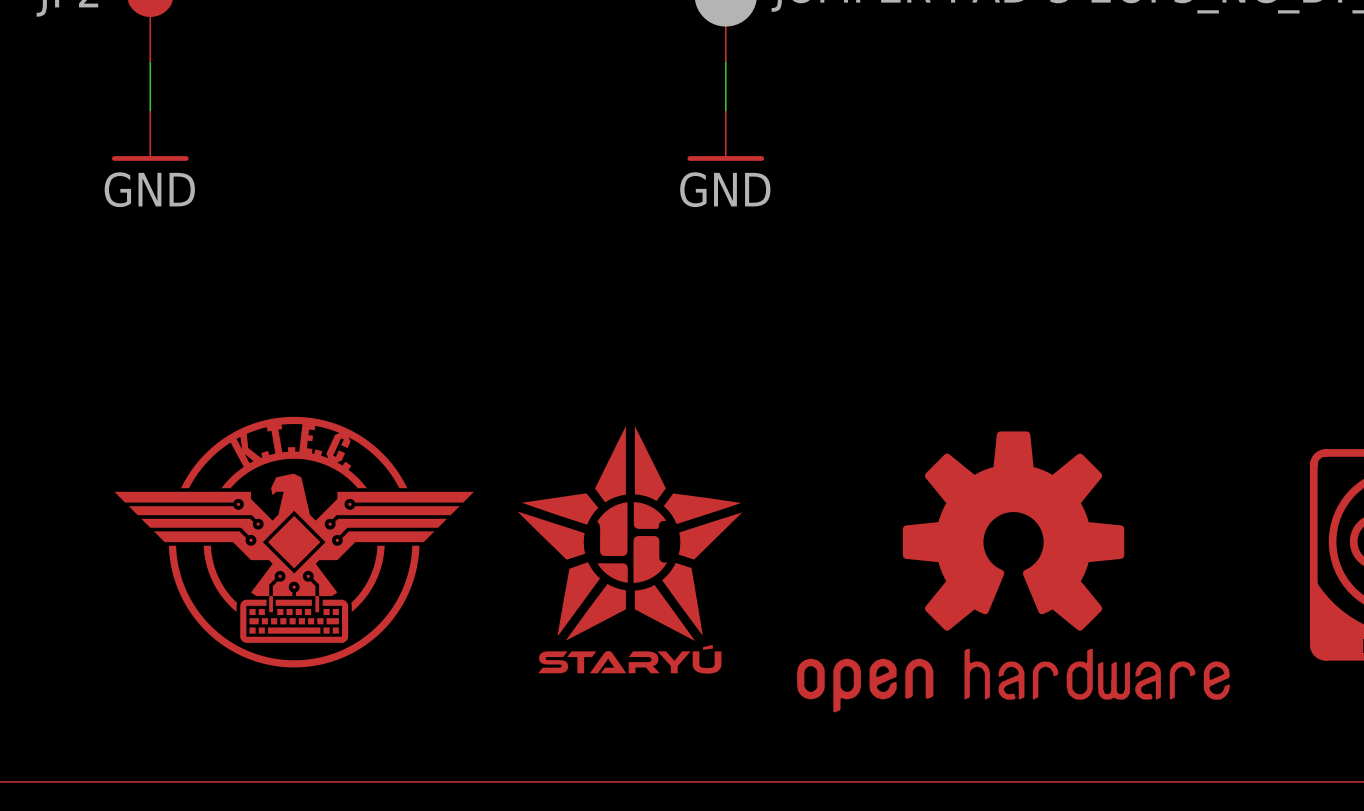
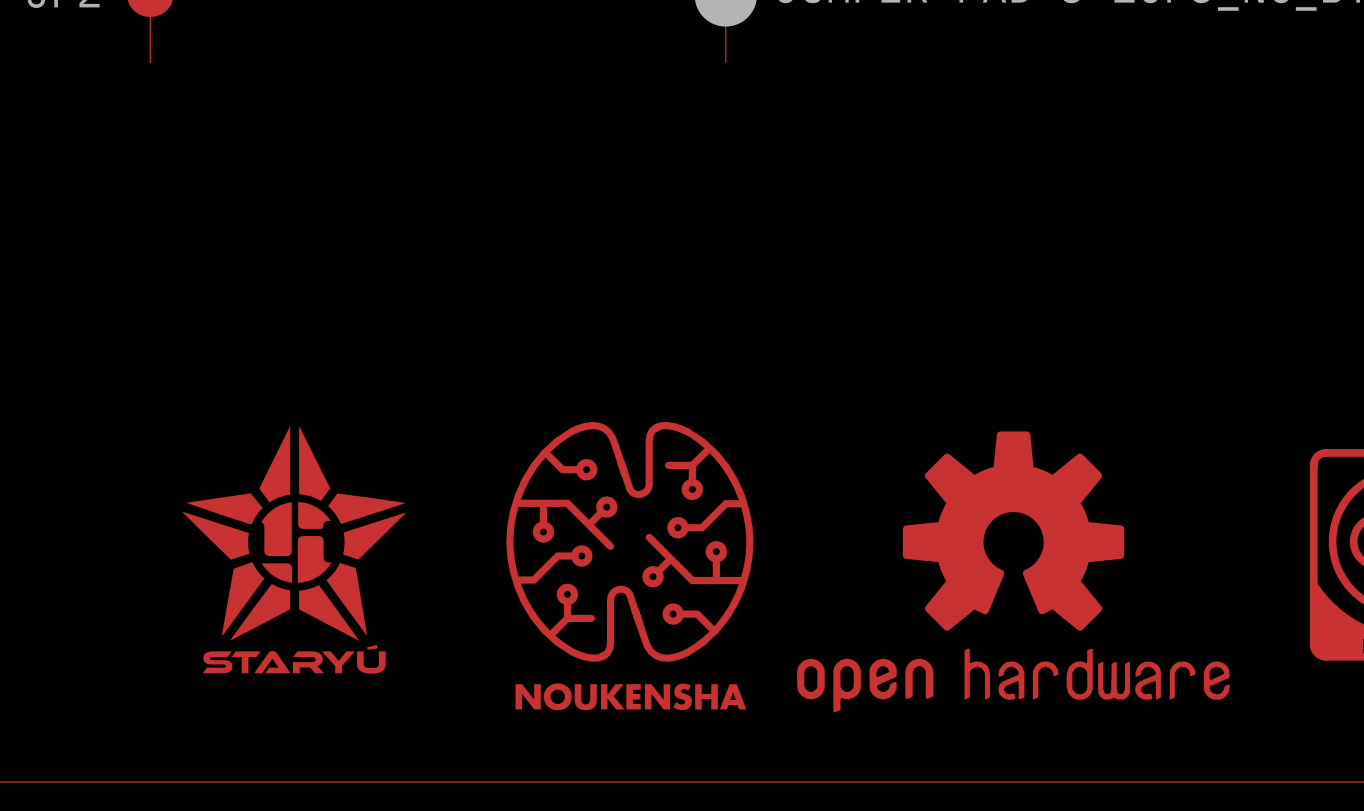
wire: (150, 62) (150, 110) -> none
wire: (725, 62) (725, 110) -> none
power symbol: GND (150, 135) -> none
power symbol: GND (725, 135) -> none
part symbol: [114, 416, 475, 668] -> [181, 425, 407, 674]
part symbol: [517, 425, 743, 674] -> [506, 421, 754, 711]

